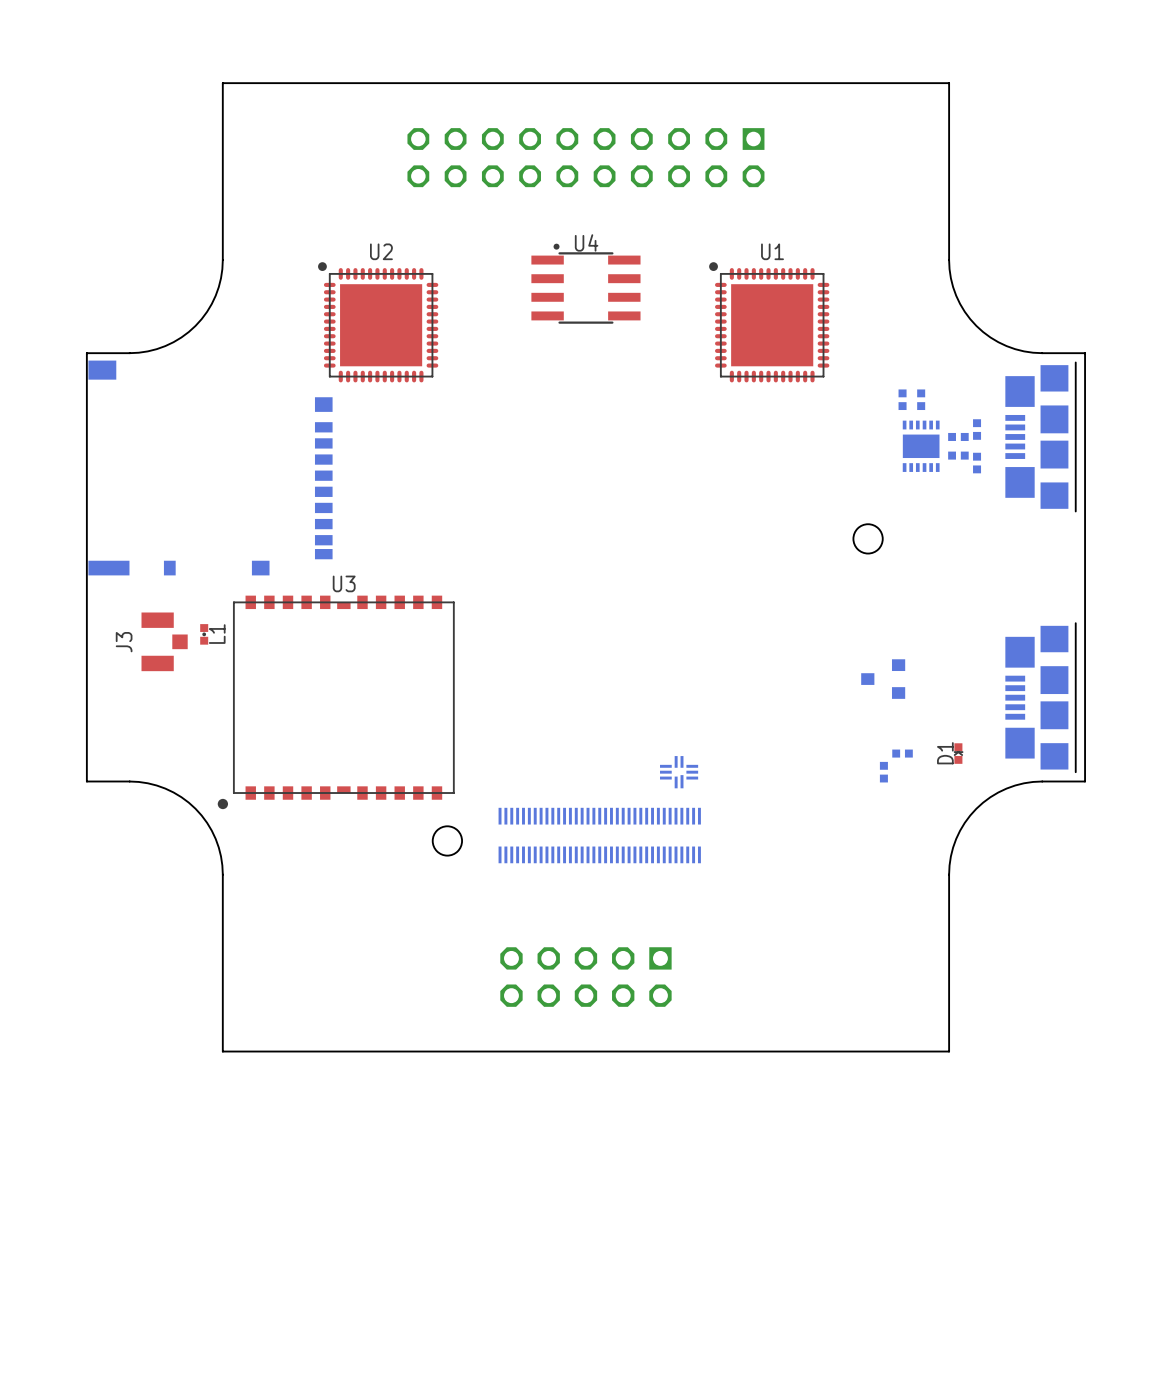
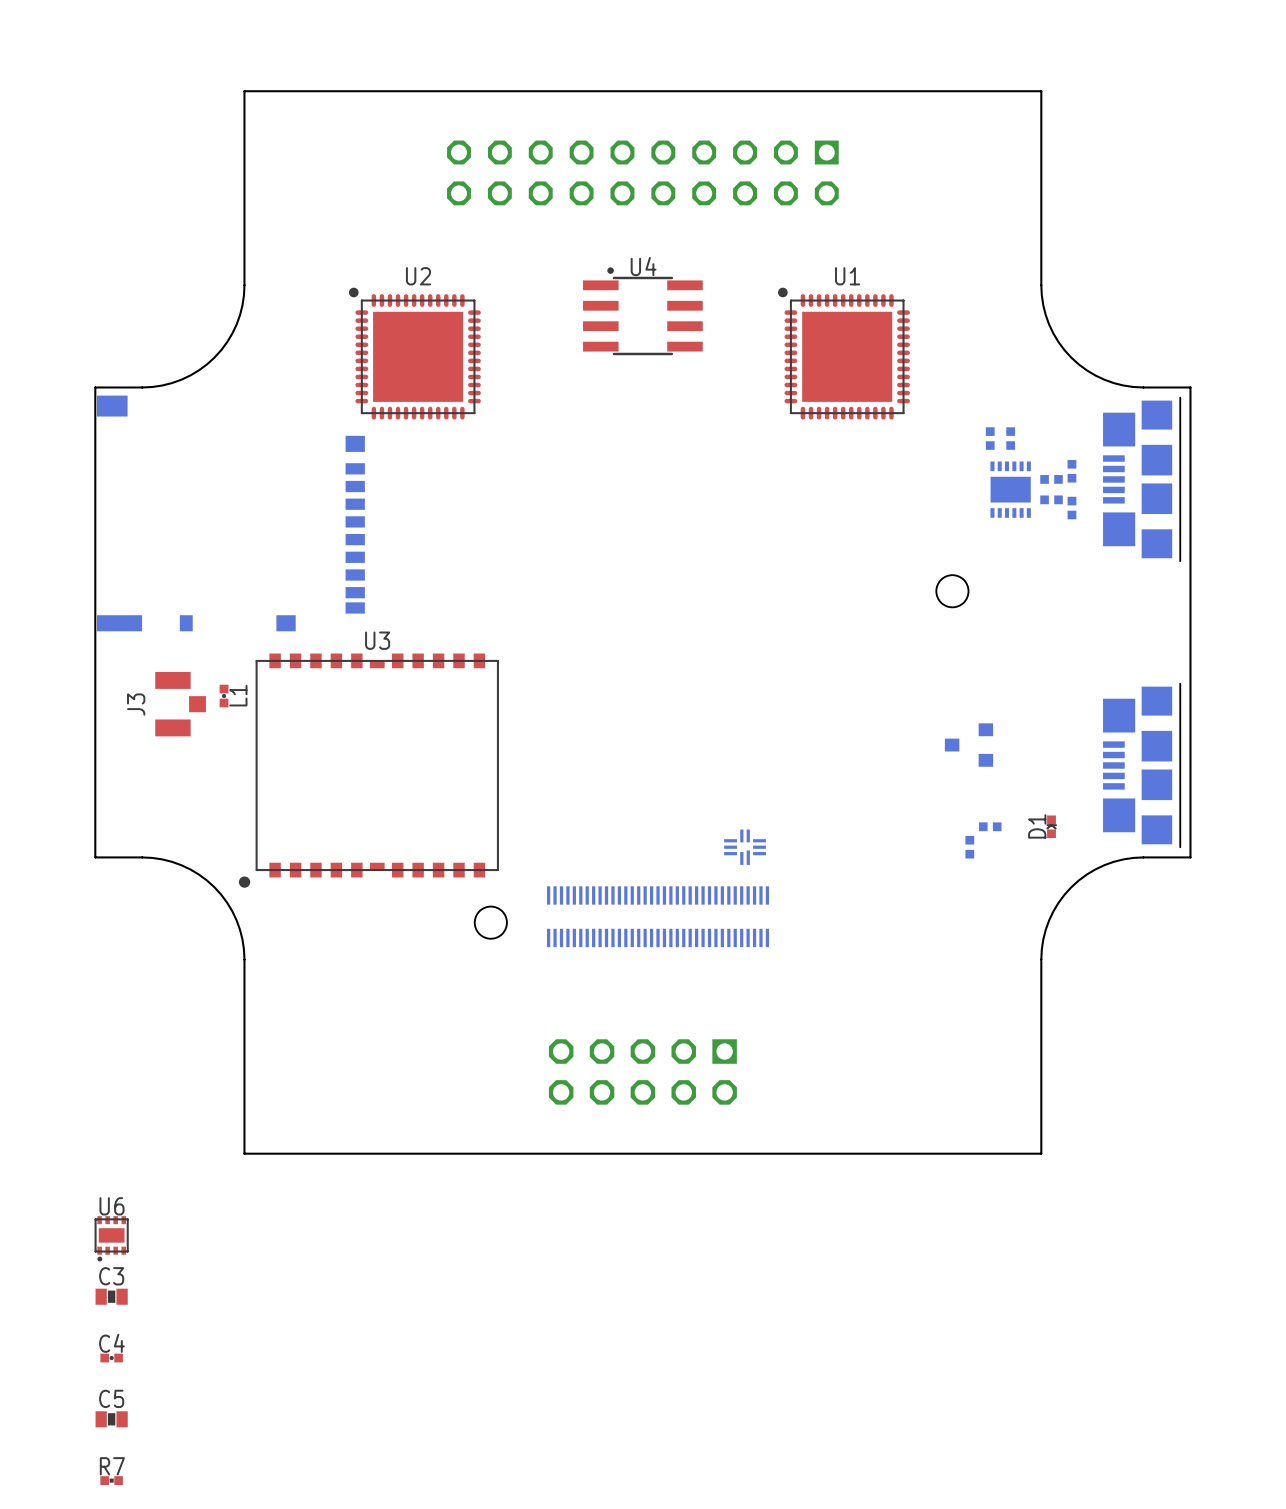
U6: none -> (111, 1238)
C3: none -> (111, 1296)
C4: none -> (111, 1358)
C5: none -> (111, 1419)
R7: none -> (111, 1480)

